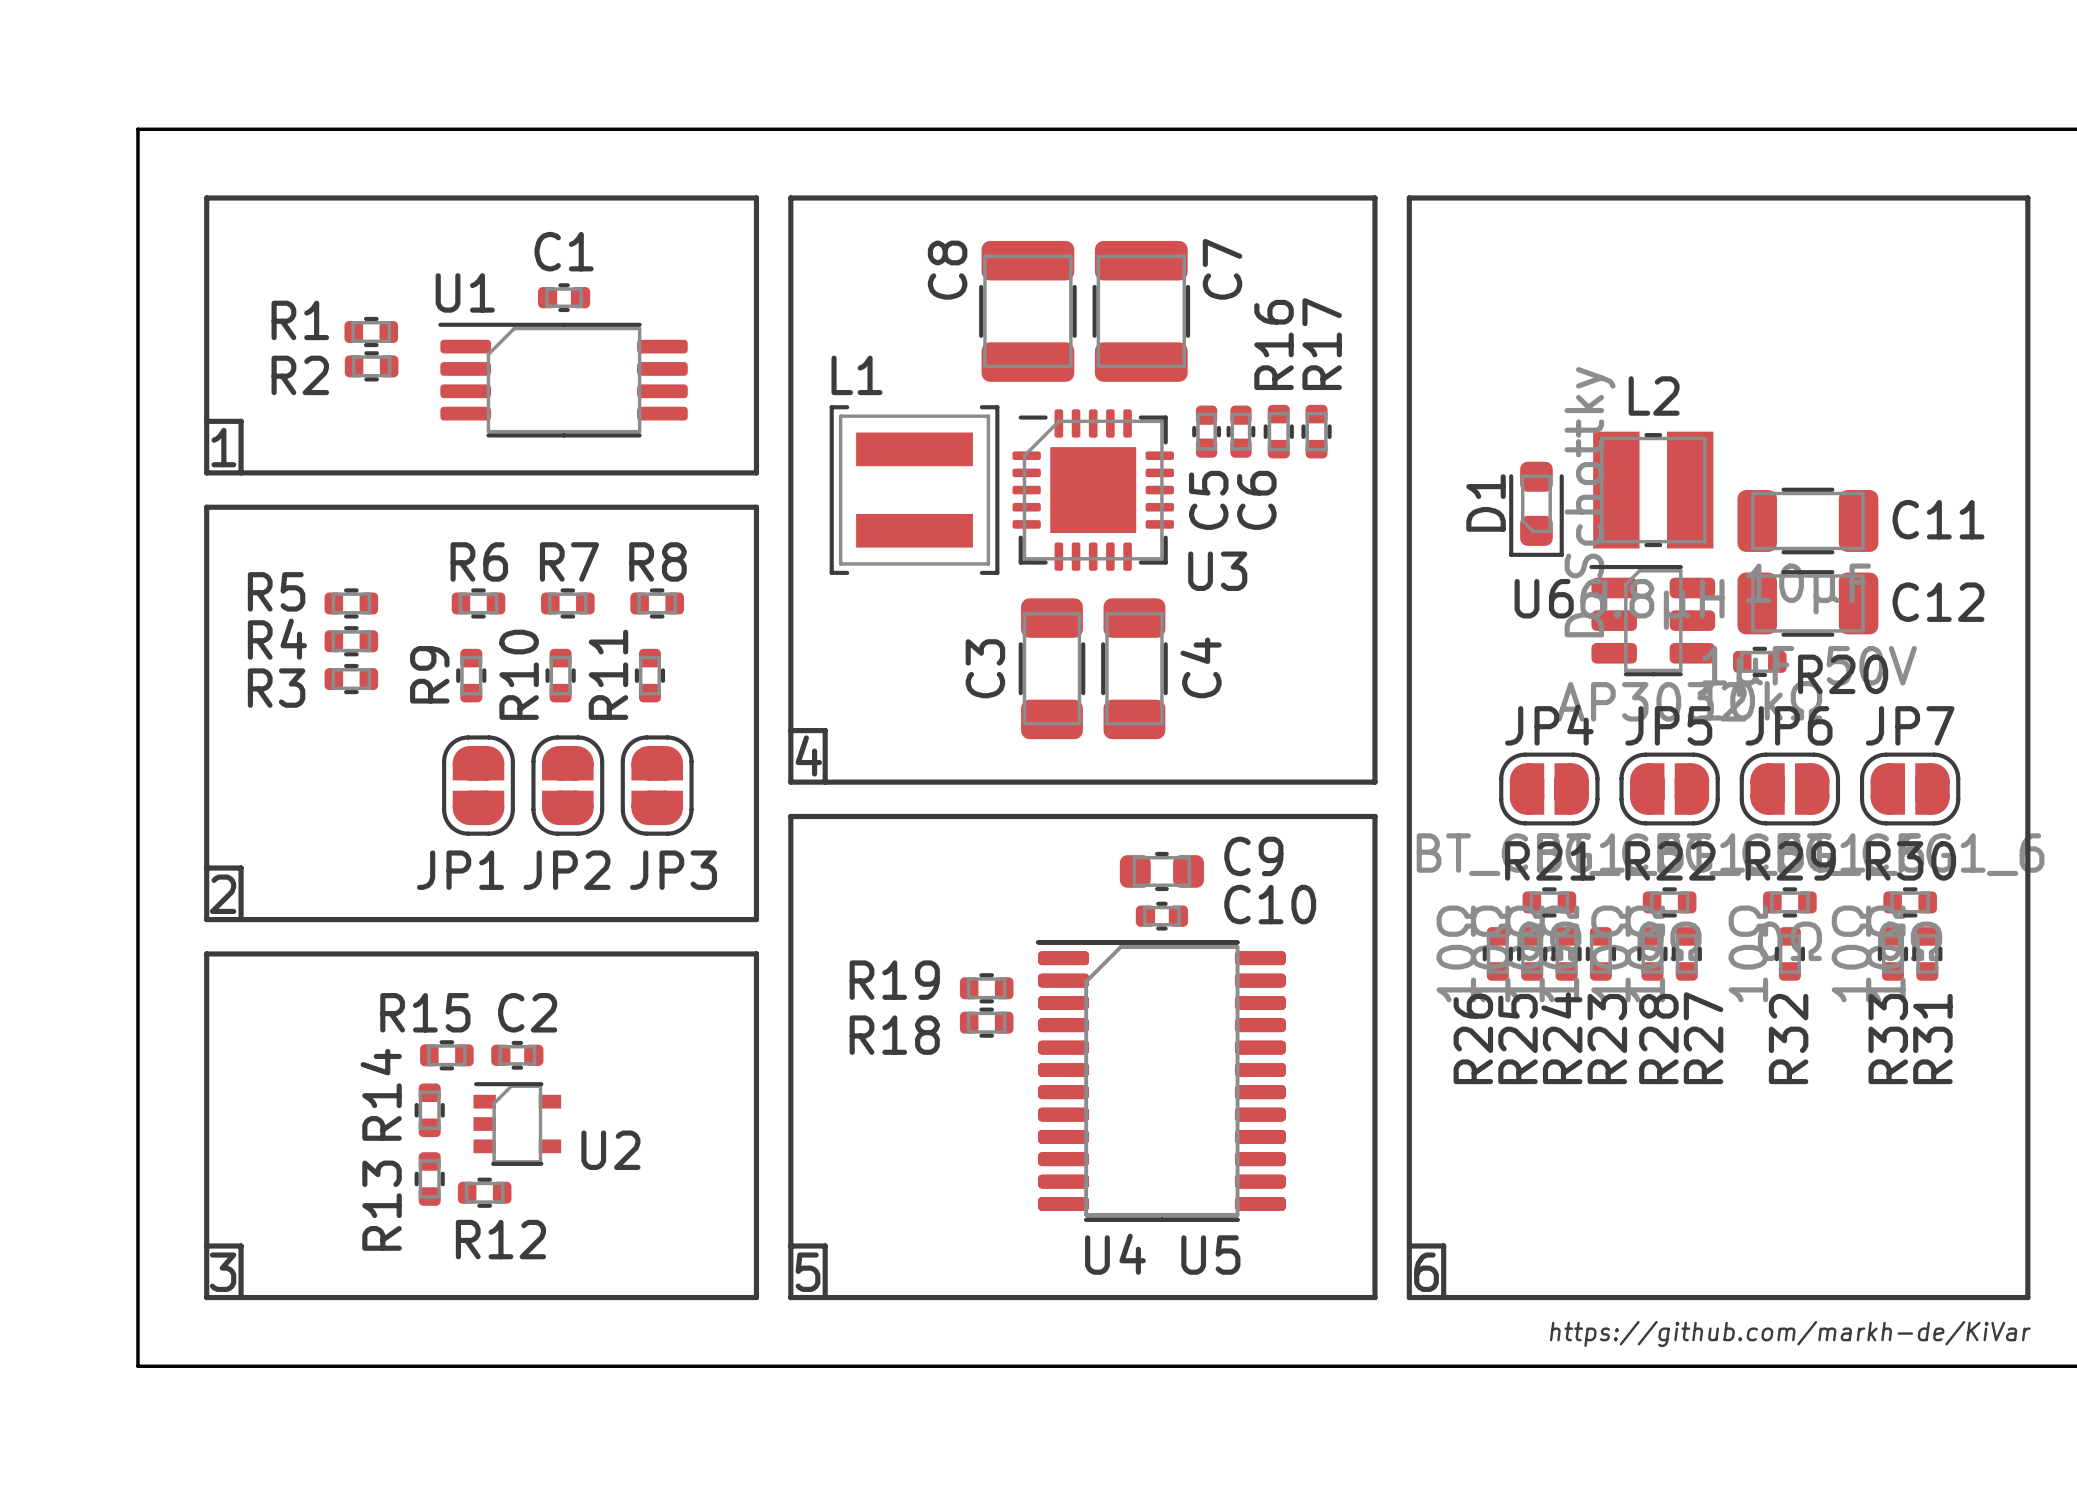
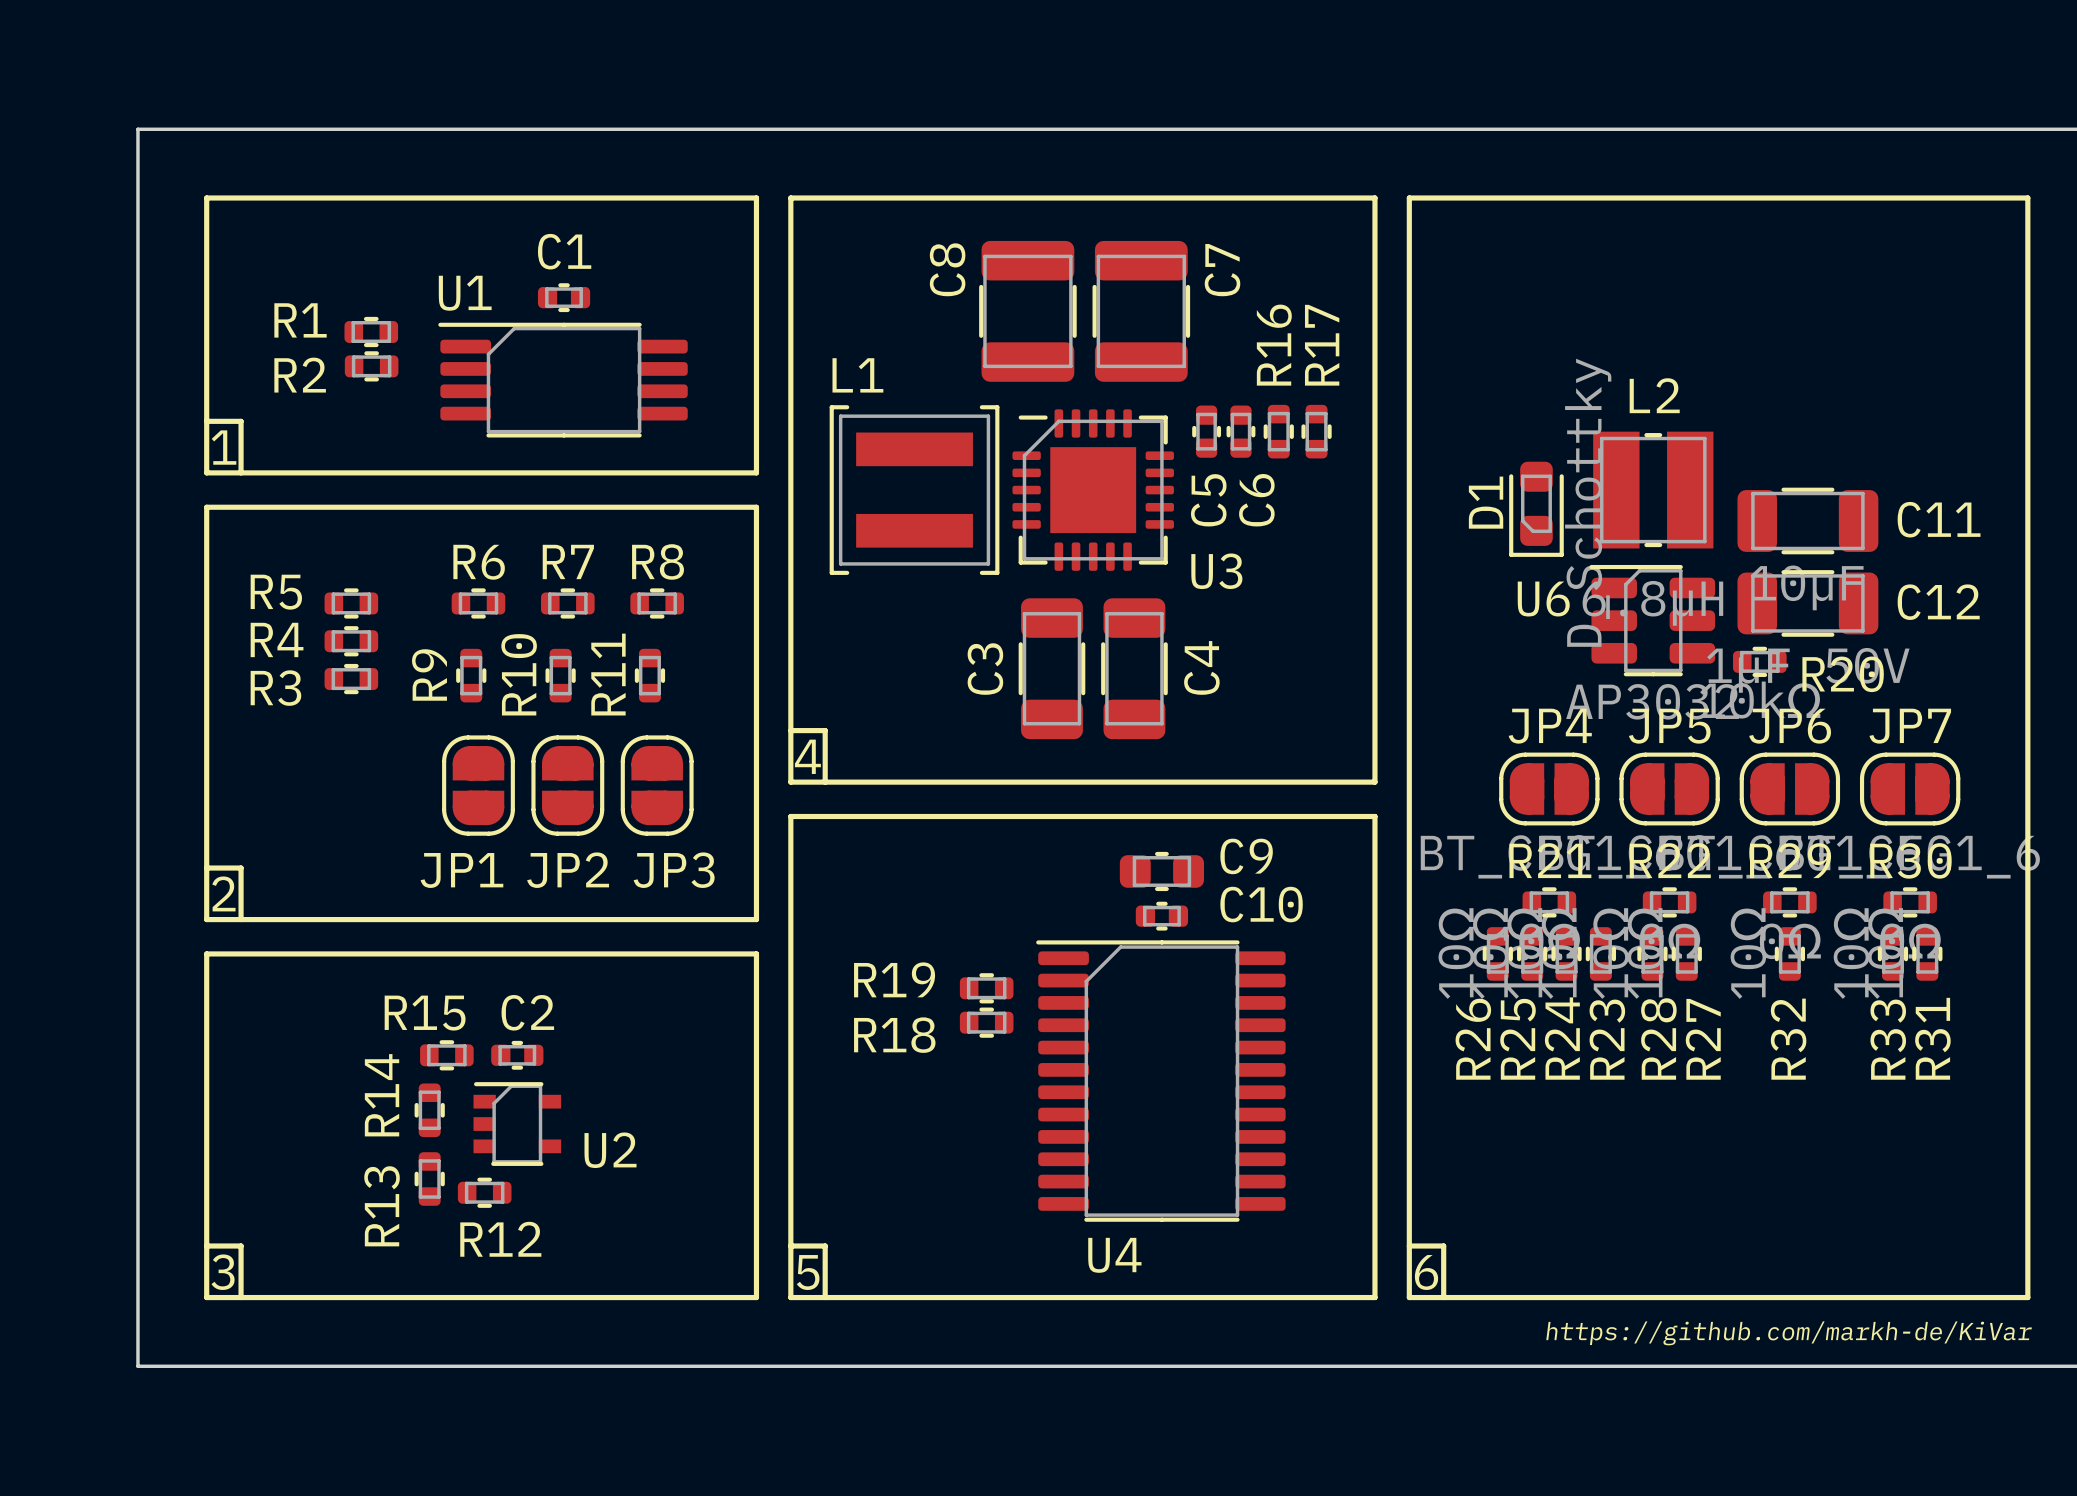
U5: (1160, 1081) -> none

